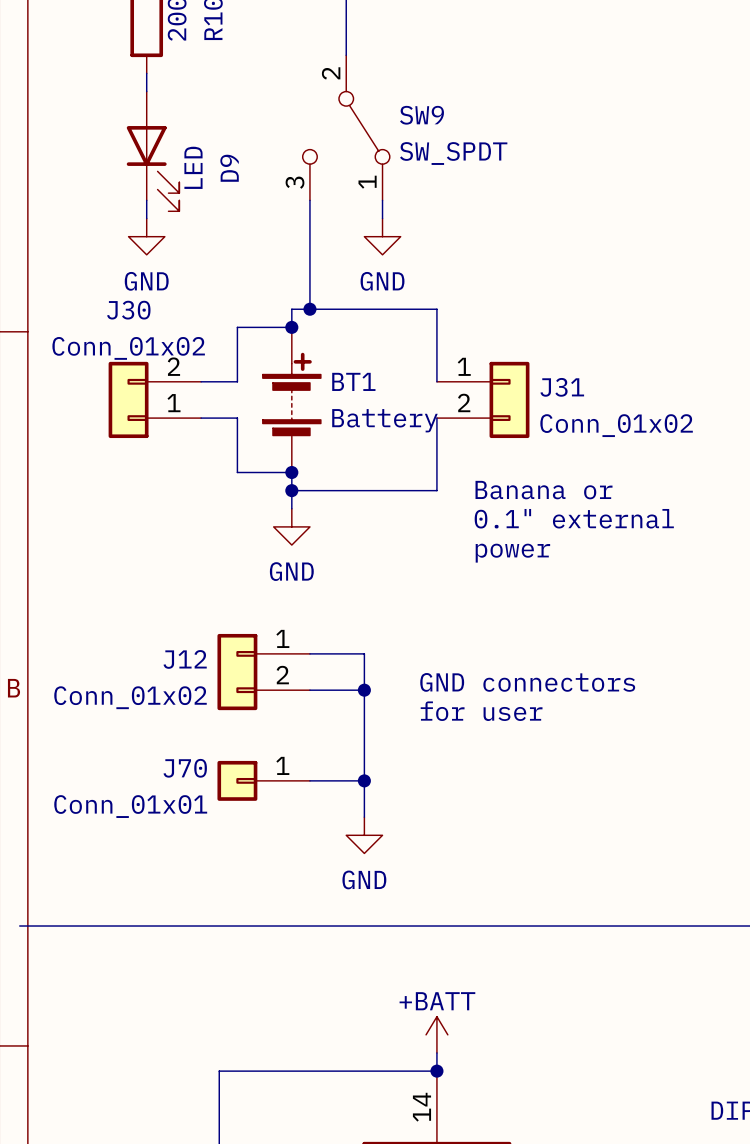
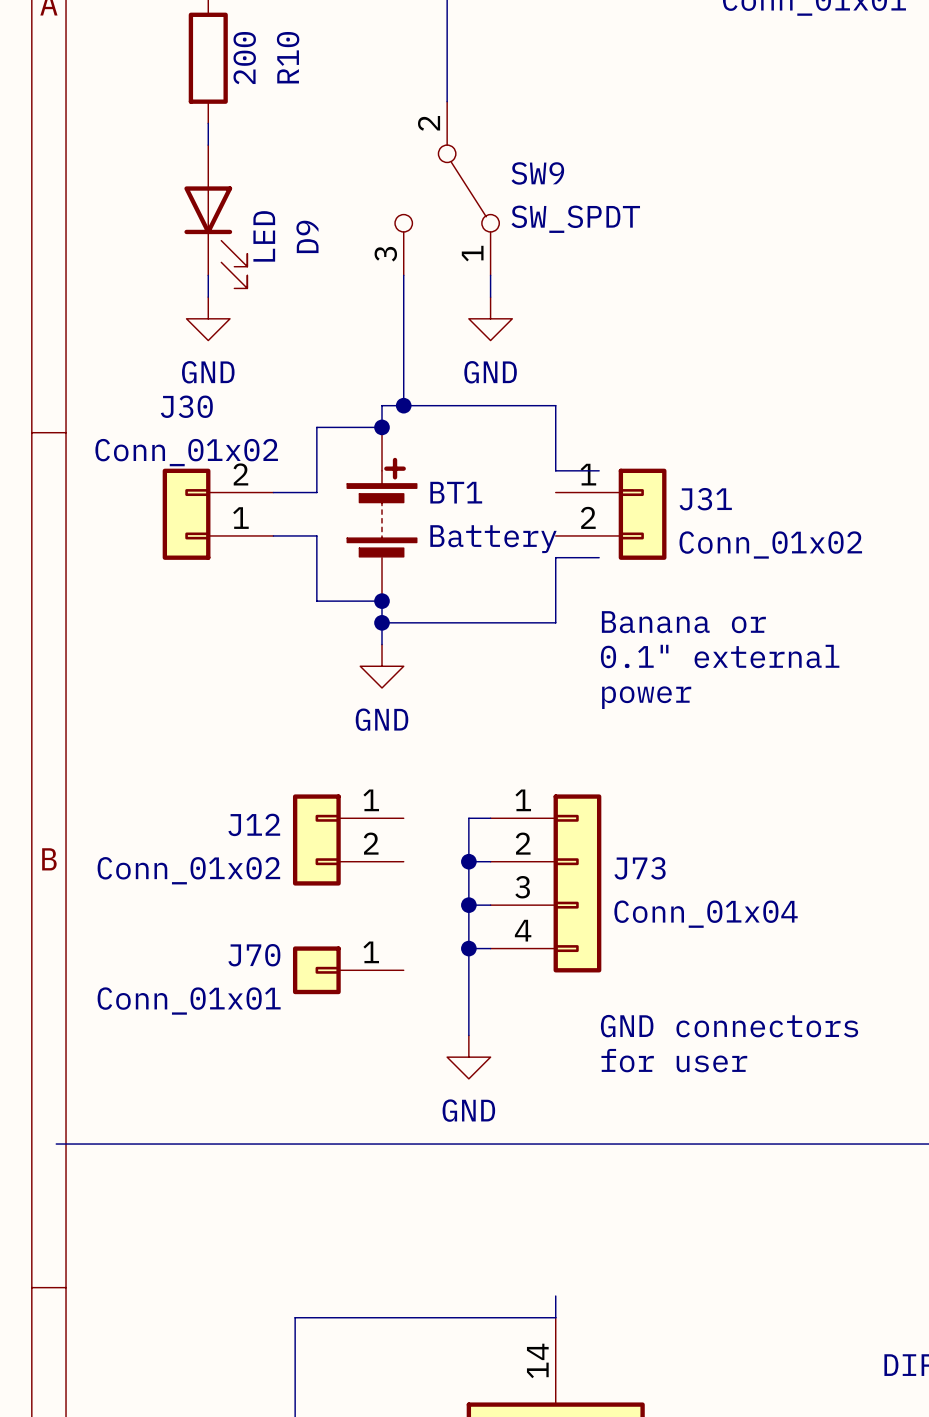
wire: (436, 363) (436, 381) -> (555, 470) (599, 470)
wire: (436, 418) (436, 436) -> (599, 557) (555, 557)
wire: (309, 653) (364, 653) -> (490, 818) (468, 818)
text position: GND connectors (527, 682) -> GND connectors (729, 1026)
wire: (309, 690) (364, 690) -> (490, 861) (468, 861)
J73: none -> Conn_01x04 (545, 883)
text position: for user (481, 711) -> for user (674, 1060)
wire: none -> (468, 905) (490, 905)
junction: none -> (468, 905)
wire: none -> (468, 948) (490, 948)
wire: (309, 780) (364, 780) -> none
junction position: (364, 780) -> (468, 948)
power symbol position: GND (364, 835) -> GND (468, 1057)
power symbol: +BATT (436, 1034) -> none
junction: (436, 1071) -> none

